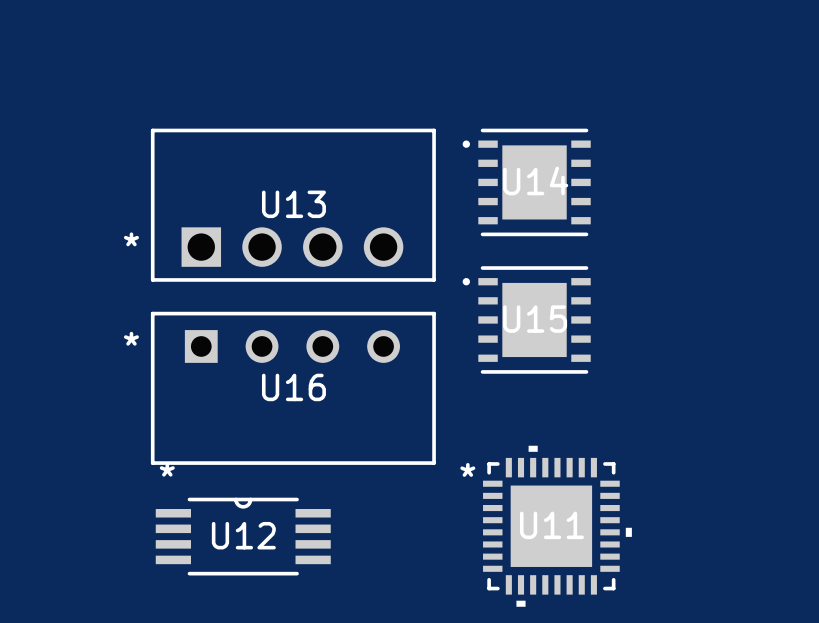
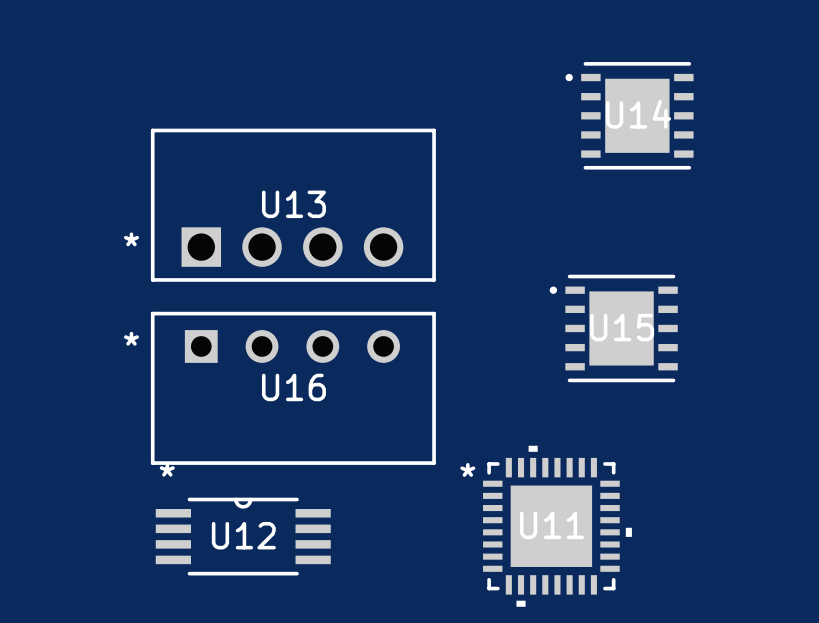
part position: (526, 182) -> (629, 115)
part position: (526, 319) -> (613, 328)

